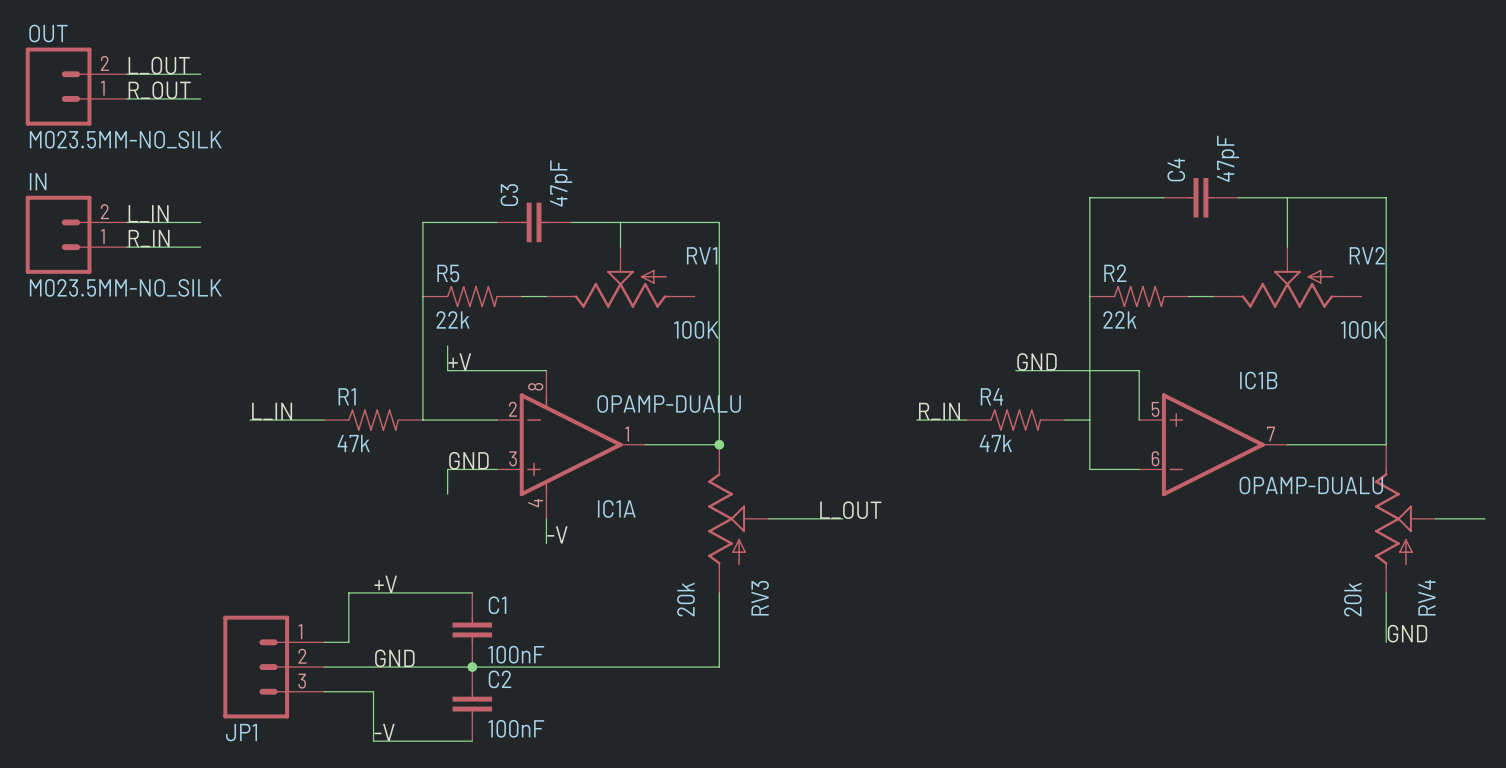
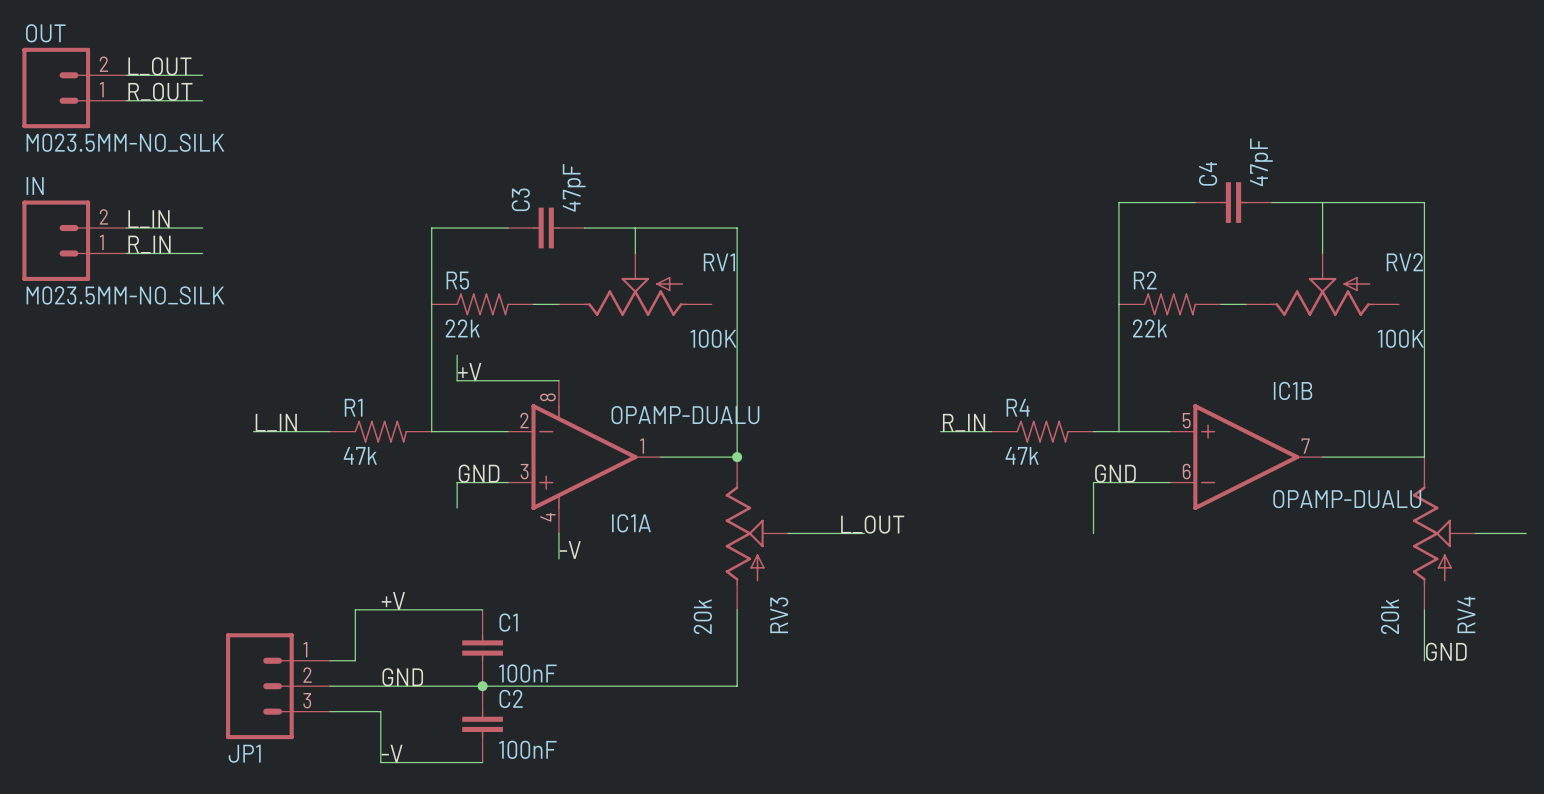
label position: GND (1037, 362) -> GND (1115, 473)
wire: (1015, 370) (1139, 370) (1139, 420) -> none
wire: (1089, 420) (1089, 469) -> (1118, 431) (1169, 431)
wire: none -> (1118, 482) (1093, 482) (1093, 533)

